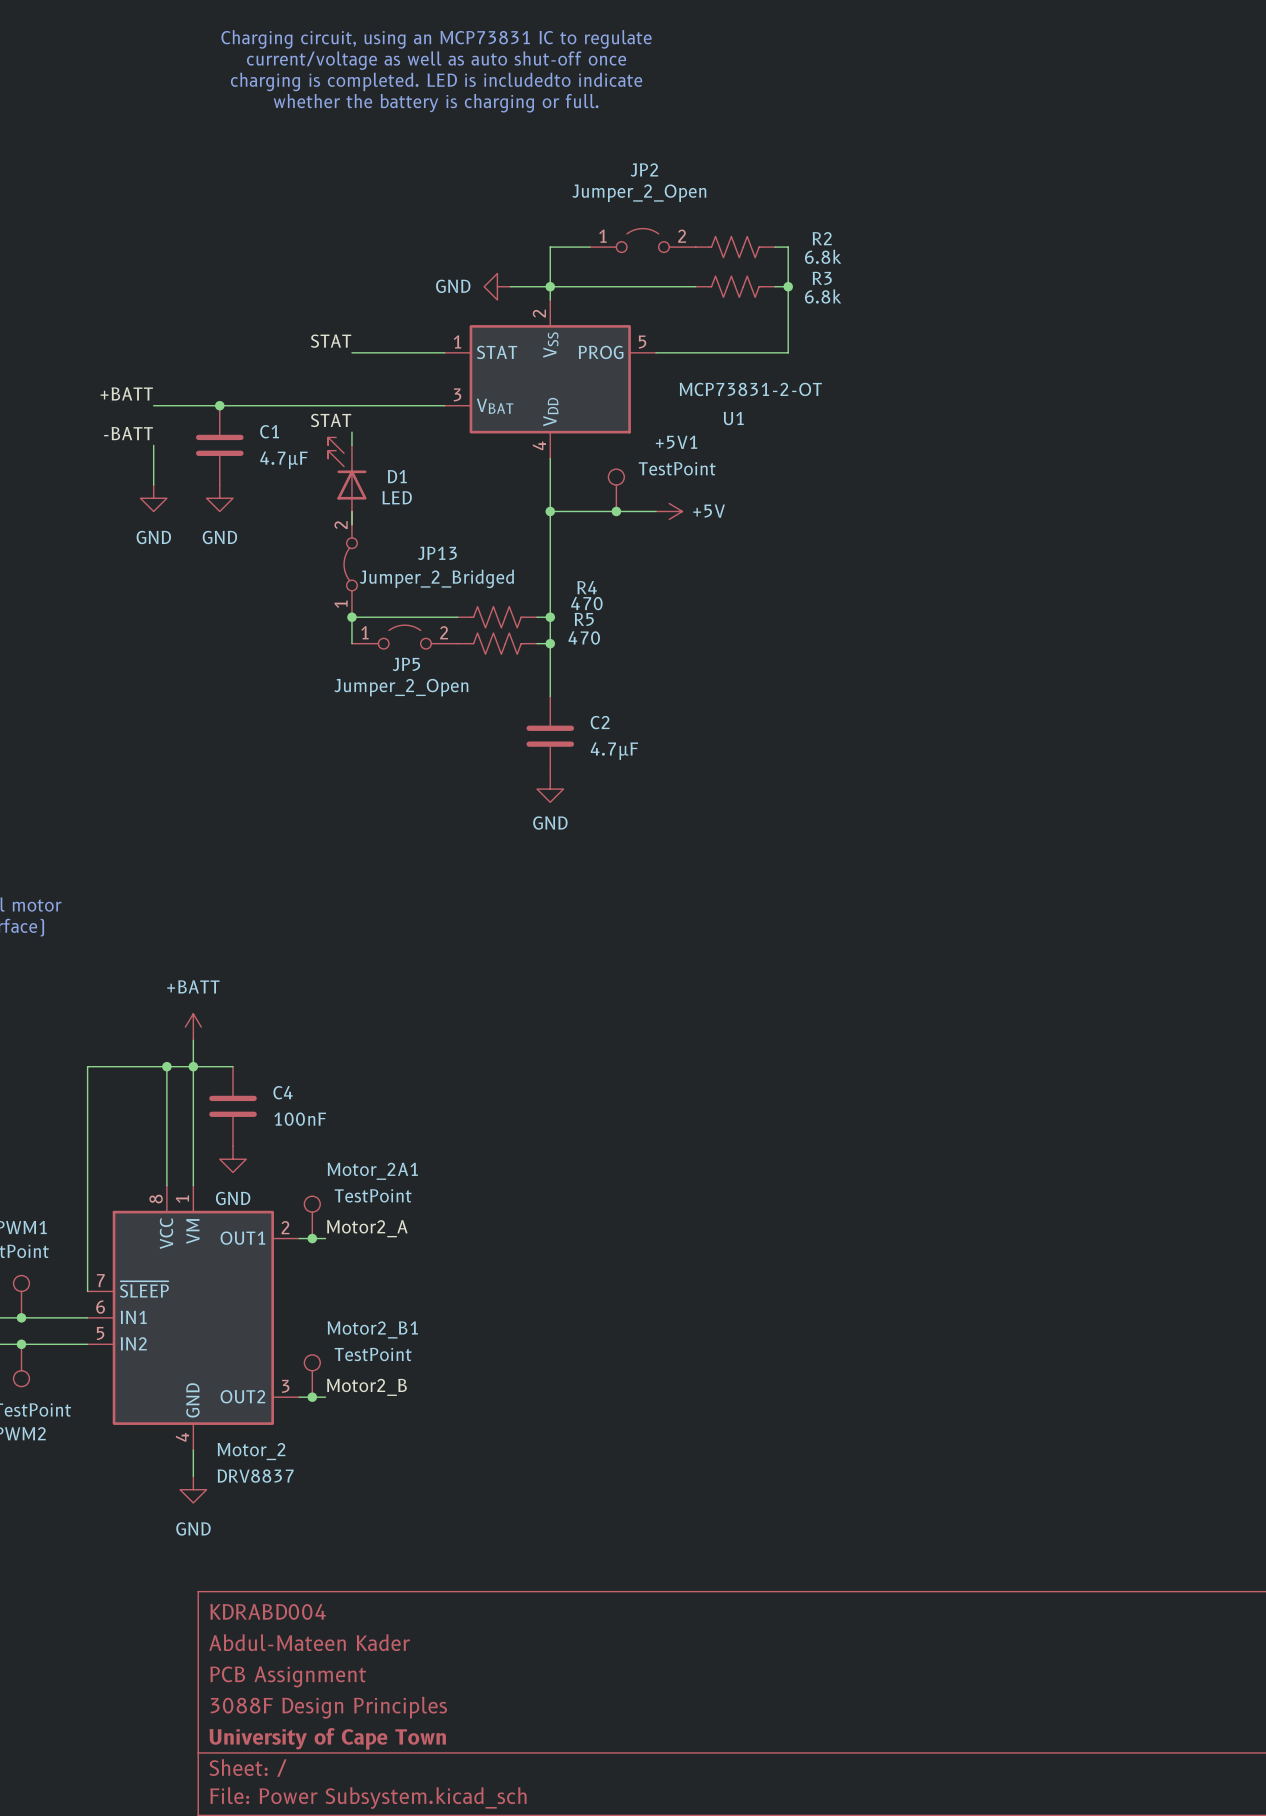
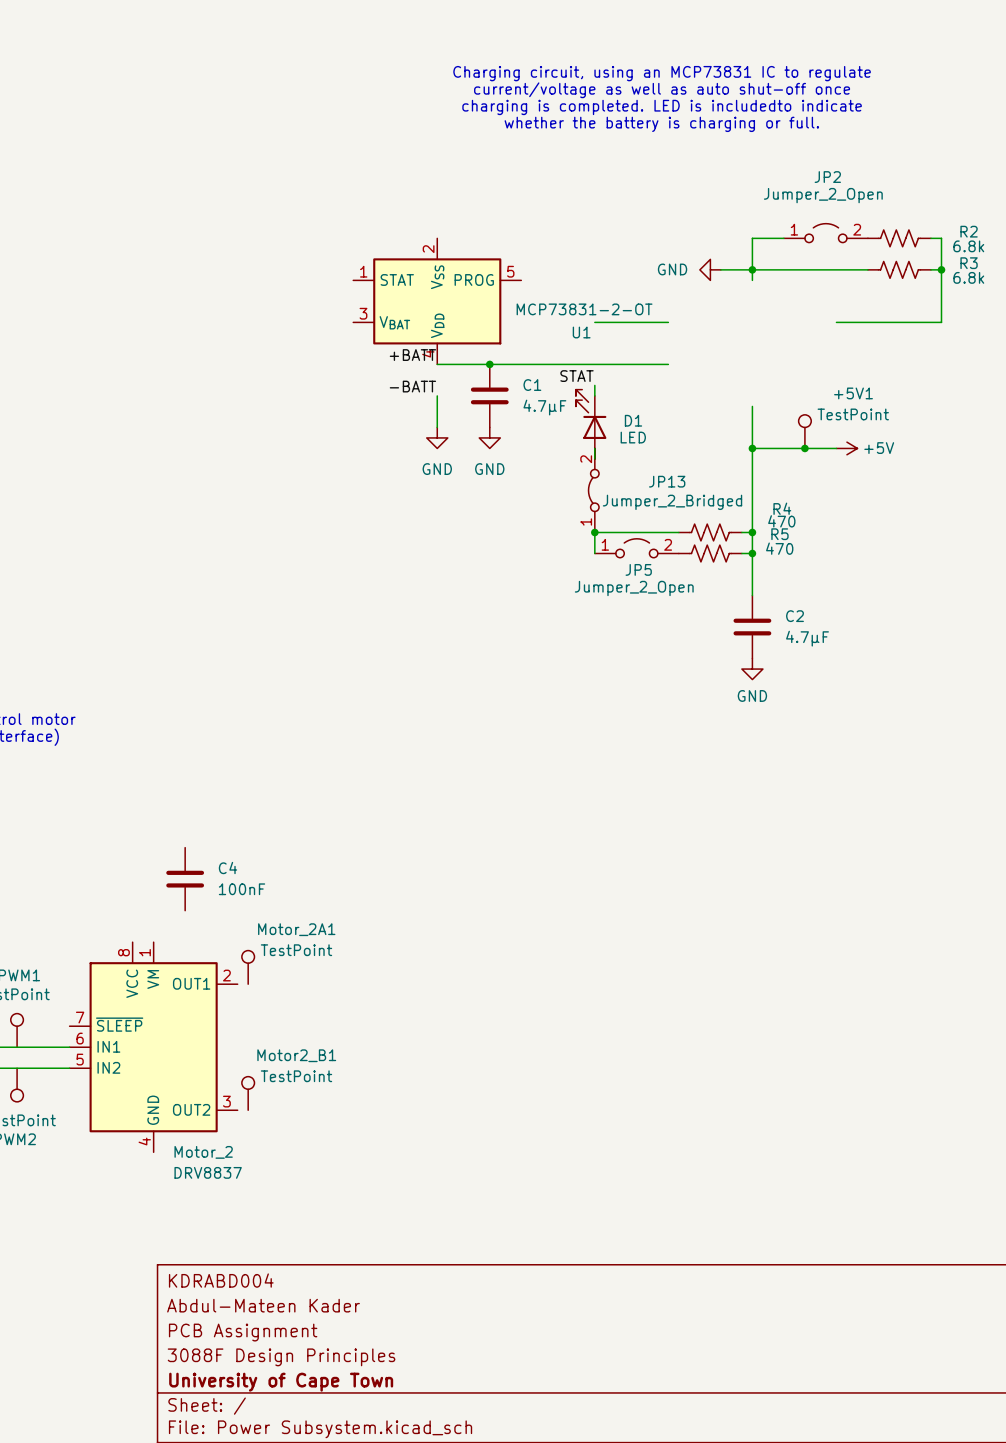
text: Charging circuit, using an MCP73831 IC to regulate (436, 39) -> none
text: current/voltage as well as auto shut-off once (436, 60) -> none
text: charging is completed. LED is includedto indicate (436, 81) -> none
text: none -> Charging circuit, using an MCP73831 IC to regulate (662, 73)
text: whether the battery is charging or full. (436, 103) -> none
text: none -> current/voltage as well as auto shut-off once (662, 90)
text: none -> charging is completed. LED is includedto indicate (662, 107)
text: none -> whether the battery is charging or full. (661, 124)
JP2 position: (642, 240) -> (825, 233)
wire: (589, 247) (550, 247) (550, 299) -> none
R2 position: (735, 247) -> (899, 238)
wire: (775, 247) (788, 247) (788, 352) (656, 352) -> none
power symbol: GND (497, 286) -> none
wire: (510, 286) (695, 286) -> none
junction: (550, 286) -> none
R3 position: (735, 286) -> (899, 269)
wire: (775, 286) (788, 286) -> none
junction: (788, 286) -> none
wire: none -> (783, 238) (752, 238) (752, 280)
wire: none -> (930, 238) (941, 238) (941, 322) (836, 322)
power symbol: none -> GND (710, 269)
wire: none -> (720, 269) (867, 269)
junction: none -> (752, 269)
wire: none -> (930, 269) (941, 269)
junction: none -> (941, 269)
label: STAT (331, 341) -> none
wire: (351, 352) (444, 352) -> none
label: +BATT (126, 393) -> none
wire: (153, 405) (444, 405) -> none
junction: (219, 405) -> none
wire: none -> (594, 322) (668, 322)
label: STAT (331, 420) -> none
wire: (351, 432) (351, 445) -> none
label: -BATT (128, 433) -> none
wire: (153, 445) (153, 485) -> none
C1 position: (219, 445) -> (489, 395)
label: none -> +BATT (412, 355)
wire: (550, 458) (550, 498) -> (437, 364) (668, 364)
junction: none -> (489, 364)
label: none -> STAT (577, 376)
D1 position: (347, 481) -> (591, 424)
wire: none -> (594, 385) (594, 395)
label: none -> -BATT (412, 386)
+5V1 position: (616, 490) -> (804, 431)
power symbol: GND (153, 498) -> none
power symbol: GND (219, 498) -> none
wire: (351, 511) (351, 524) -> none
wire: (550, 511) (656, 511) -> none
junction: (550, 511) -> none
junction: (616, 511) -> none
power symbol: +5V (669, 511) -> none
wire: none -> (752, 406) (752, 595)
wire: (550, 537) (550, 696) -> none
power symbol: none -> GND (437, 437)
power symbol: none -> GND (489, 437)
JP13 position: (350, 564) -> (593, 490)
wire: none -> (594, 448) (594, 458)
wire: none -> (752, 448) (836, 448)
junction: none -> (752, 448)
junction: none -> (804, 448)
power symbol: none -> +5V (846, 448)
junction: (351, 617) -> none
wire: (457, 617) (351, 617) (351, 643) -> none
R4 position: (497, 617) -> (710, 532)
wire: (537, 617) (550, 617) -> none
junction: (550, 617) -> none
JP5 position: (404, 637) -> (636, 548)
R5 position: (497, 643) -> (710, 553)
wire: (537, 643) (550, 643) -> none
junction: (550, 643) -> none
junction: none -> (594, 532)
wire: none -> (678, 532) (594, 532) (594, 553)
wire: none -> (741, 532) (752, 532)
junction: none -> (752, 532)
wire: none -> (741, 553) (752, 553)
junction: none -> (752, 553)
C2 position: (550, 736) -> (752, 627)
power symbol: GND (550, 789) -> none
power symbol: none -> GND (752, 669)
power symbol: +BATT (193, 1027) -> none
wire: (193, 1040) (193, 1185) -> none
wire: (166, 1066) (166, 1185) -> none
junction: (166, 1066) -> none
junction: (193, 1066) -> none
wire: (233, 1066) (87, 1066) (87, 1291) -> none
power symbol: GND (233, 1159) -> none
label: Motor2_A (367, 1228) -> none
wire: (299, 1238) (325, 1238) -> none
junction: (312, 1238) -> none
junction: (21, 1317) -> none
junction: (21, 1344) -> none
label: Motor2_B (366, 1387) -> none
wire: (299, 1397) (325, 1397) -> none
junction: (312, 1397) -> none
wire: (193, 1450) (193, 1476) -> none
power symbol: GND (193, 1489) -> none

